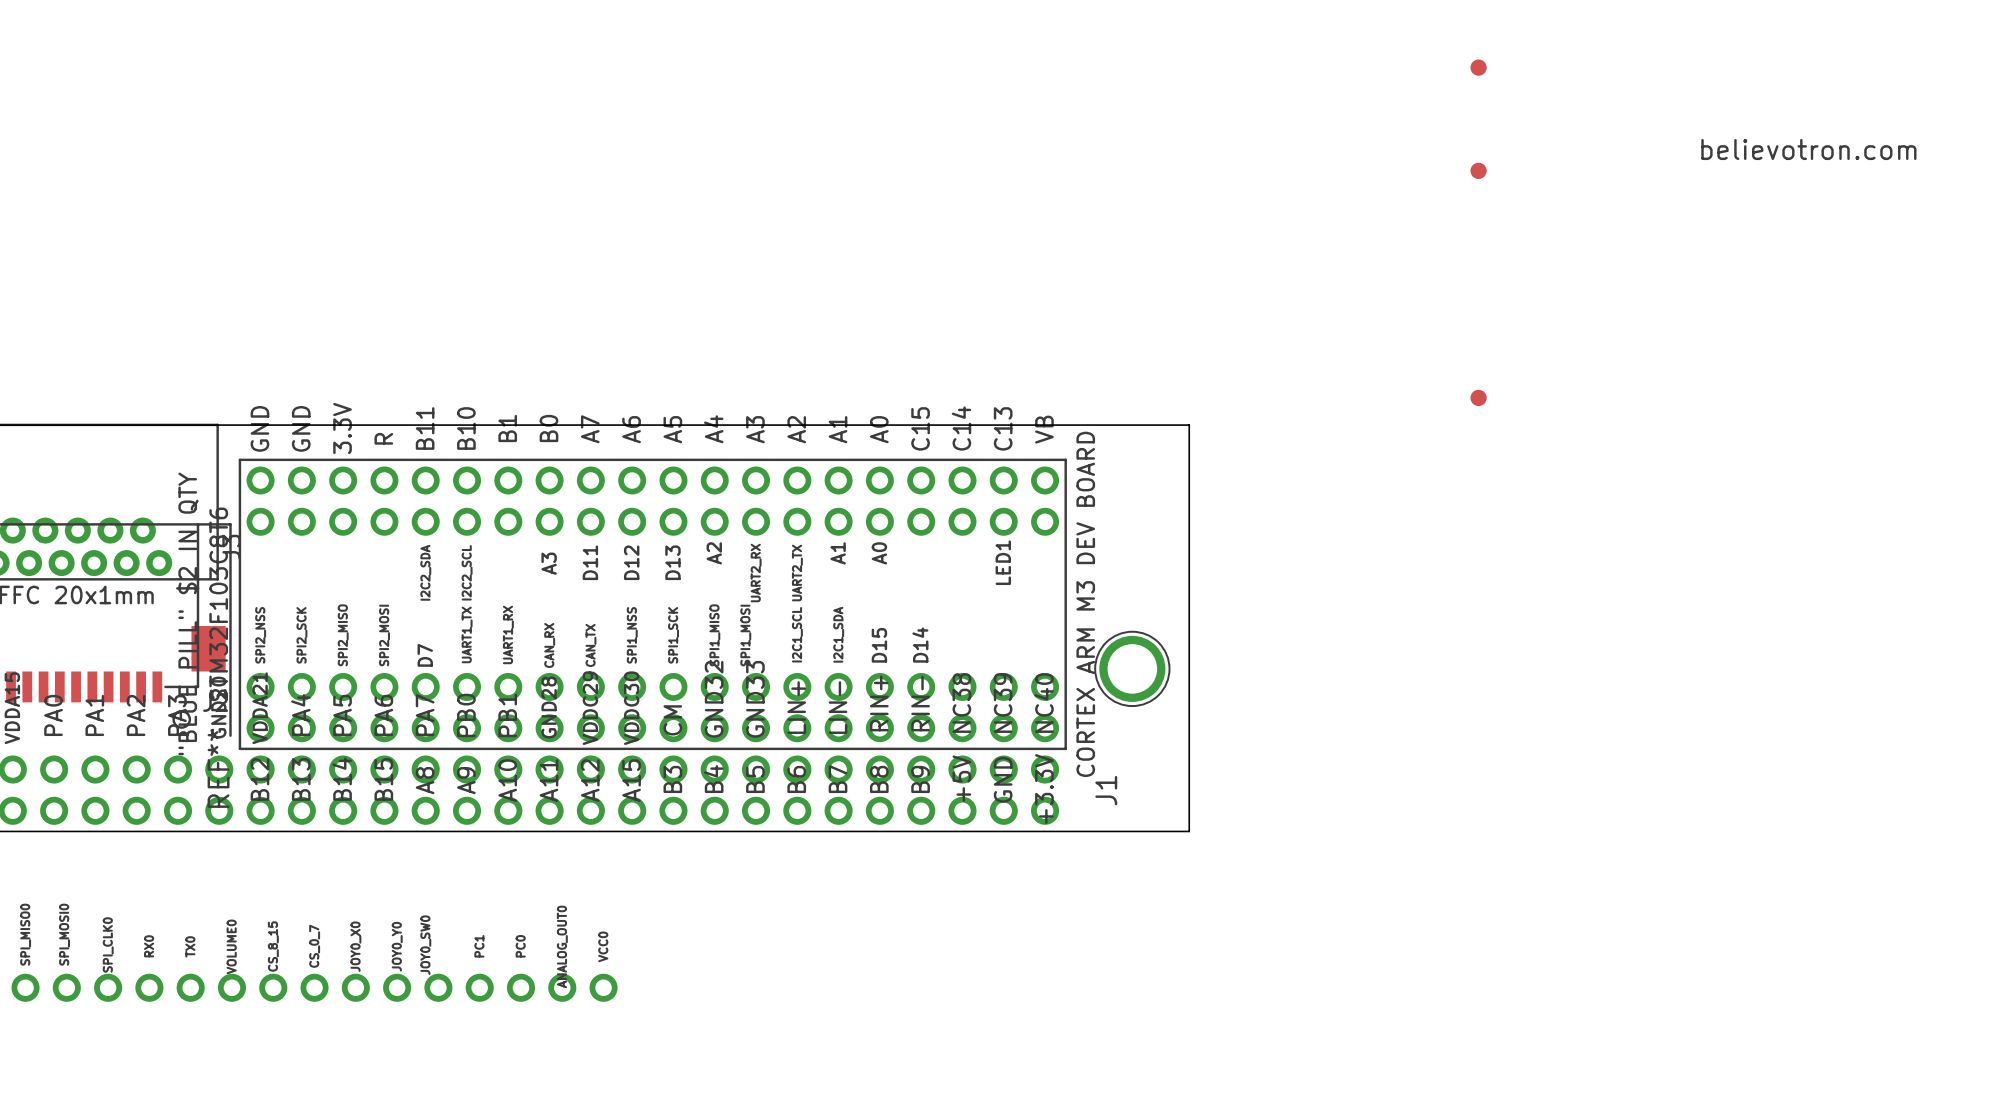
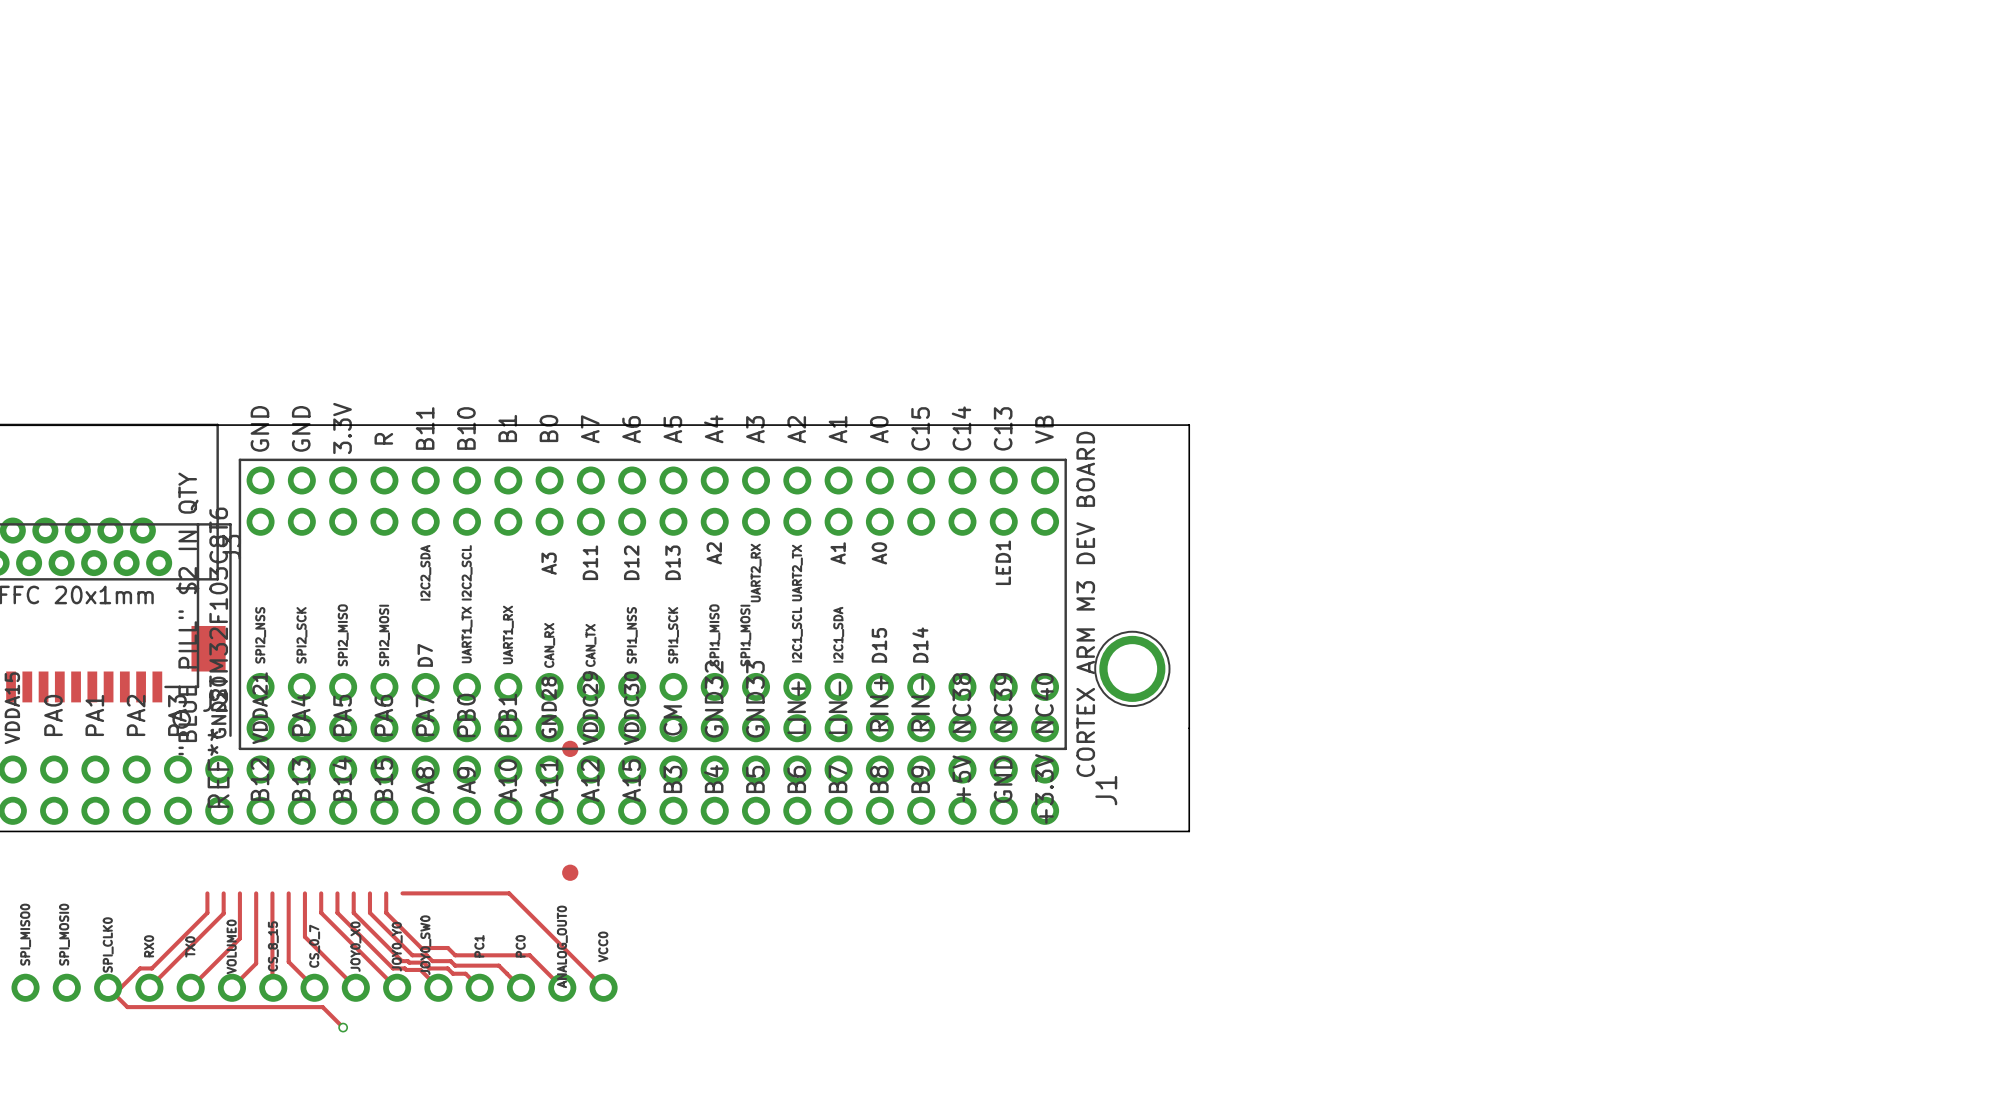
part: (1478, 67) -> none
text: believotron.com (1808, 149) -> none
part: (1478, 170) -> none
part: (1478, 397) -> none
part: none -> (570, 748)
part: none -> (570, 872)
track: none -> (207, 893) (207, 912) (151, 968) (140, 968) (120, 987) (108, 987) (127, 1007) (322, 1007) (343, 1027)
track: none -> (223, 893) (223, 913) (149, 987)
track: none -> (239, 893) (239, 938) (190, 987)
track: none -> (256, 893) (256, 963) (231, 987)
track: none -> (272, 893) (273, 987)
track: none -> (288, 893) (288, 961) (314, 987)
track: none -> (304, 893) (304, 936) (355, 987)
track: none -> (321, 893) (321, 912) (397, 987)
track: none -> (337, 893) (337, 912) (393, 968) (420, 969) (438, 987)
track: none -> (353, 893) (353, 912) (401, 961) (423, 962) (429, 968) (447, 968) (452, 973) (465, 973) (479, 987)
track: none -> (369, 893) (369, 912) (412, 955) (426, 955) (432, 961) (450, 961) (455, 965) (498, 965) (520, 987)
track: none -> (386, 893) (386, 912) (421, 948) (447, 948) (455, 955) (529, 955) (562, 987)
track: none -> (402, 893) (509, 893) (603, 987)
via: none -> (343, 1027)

